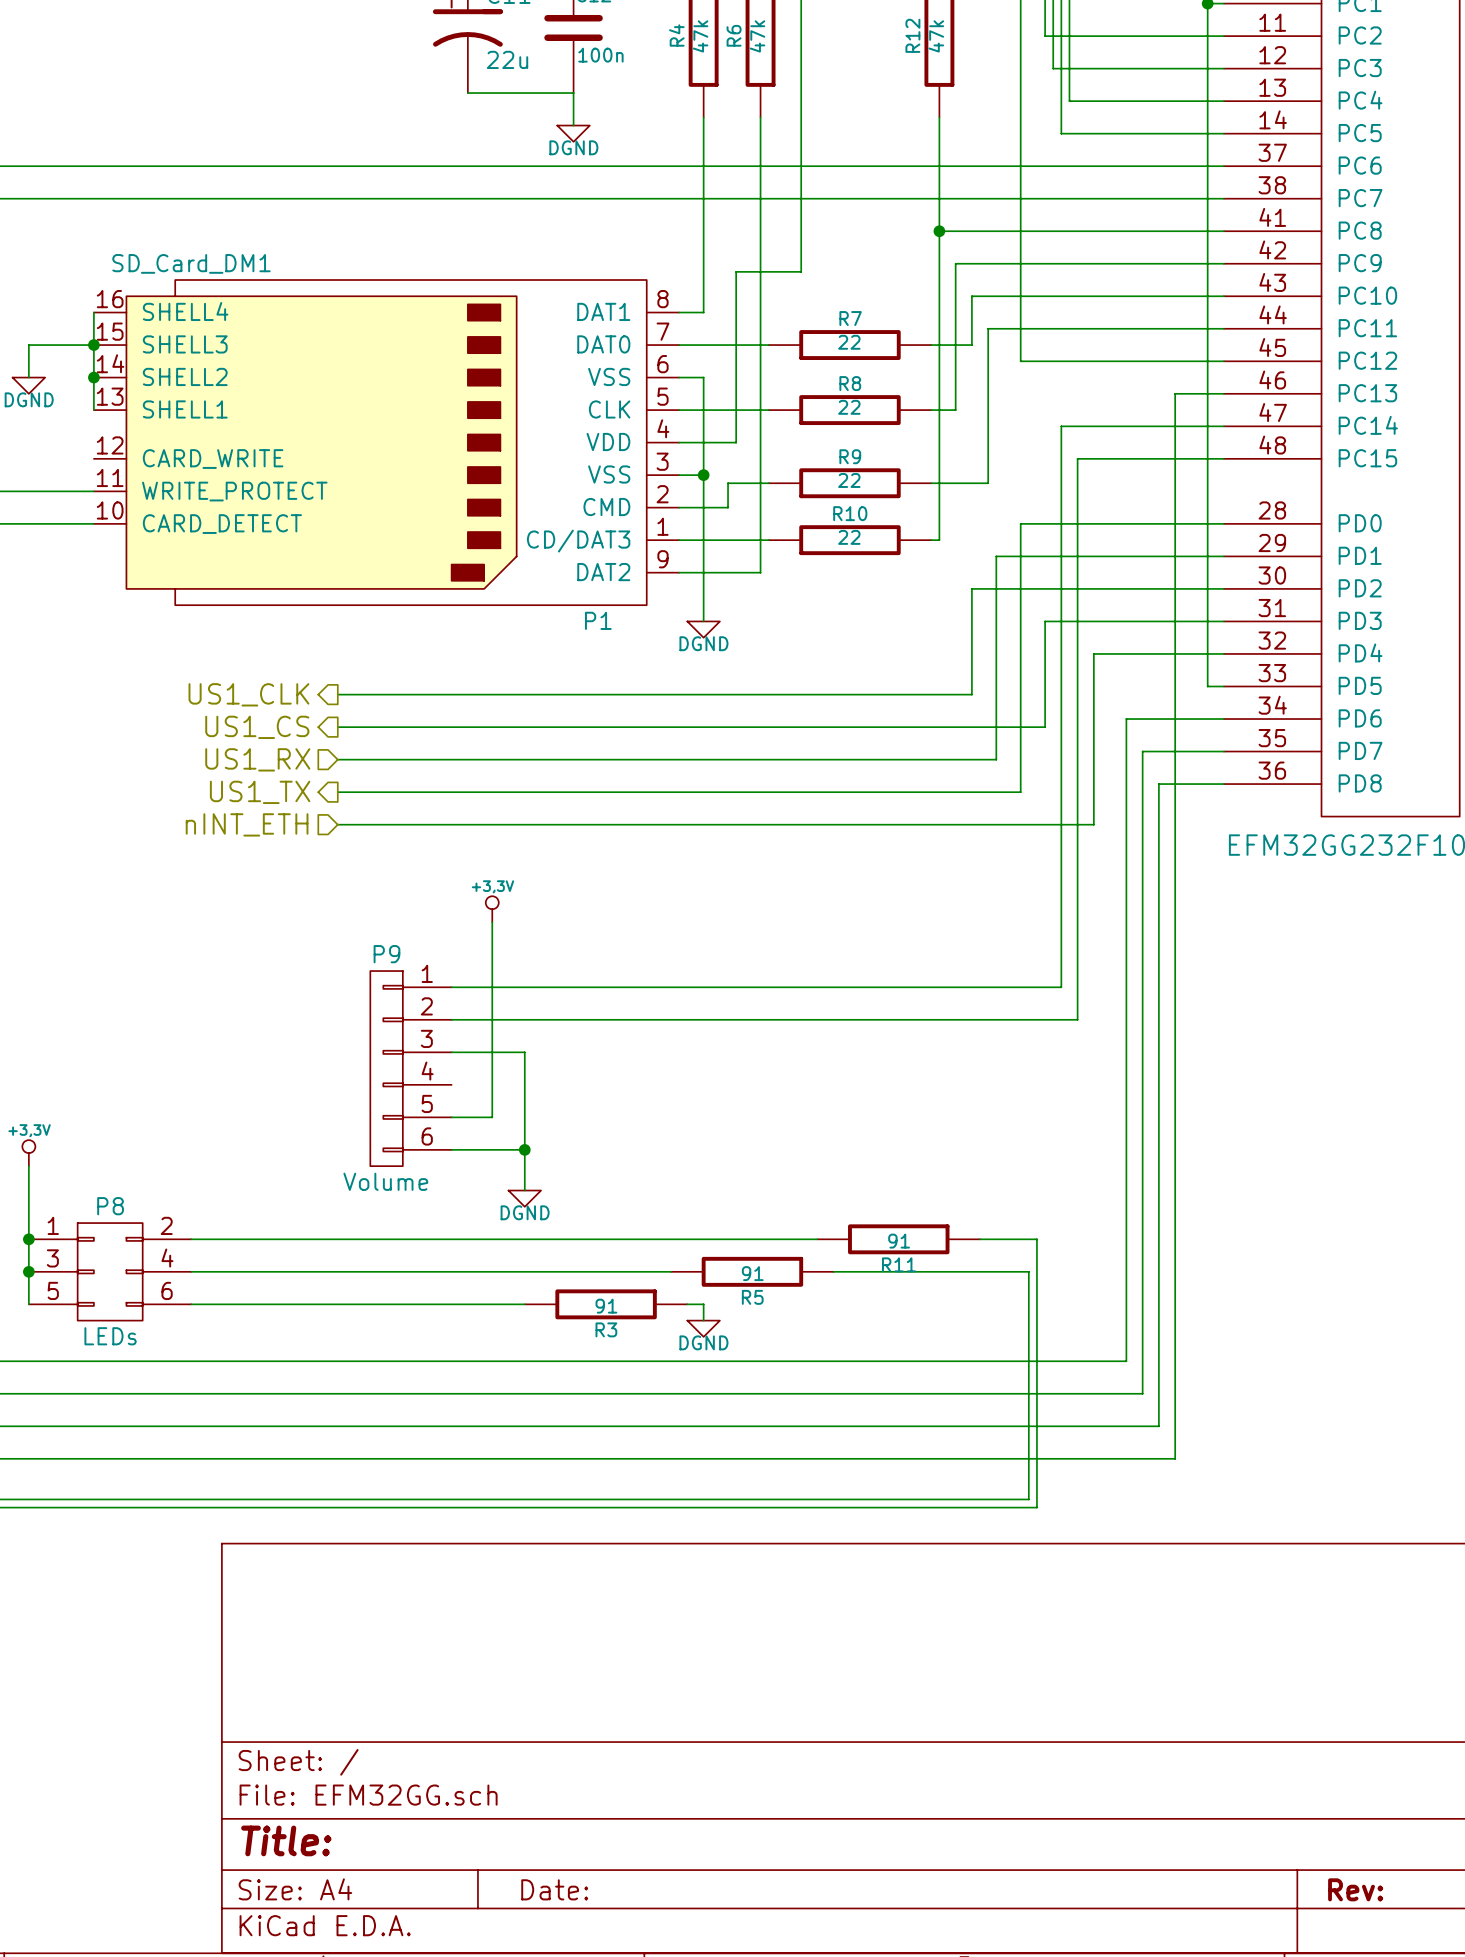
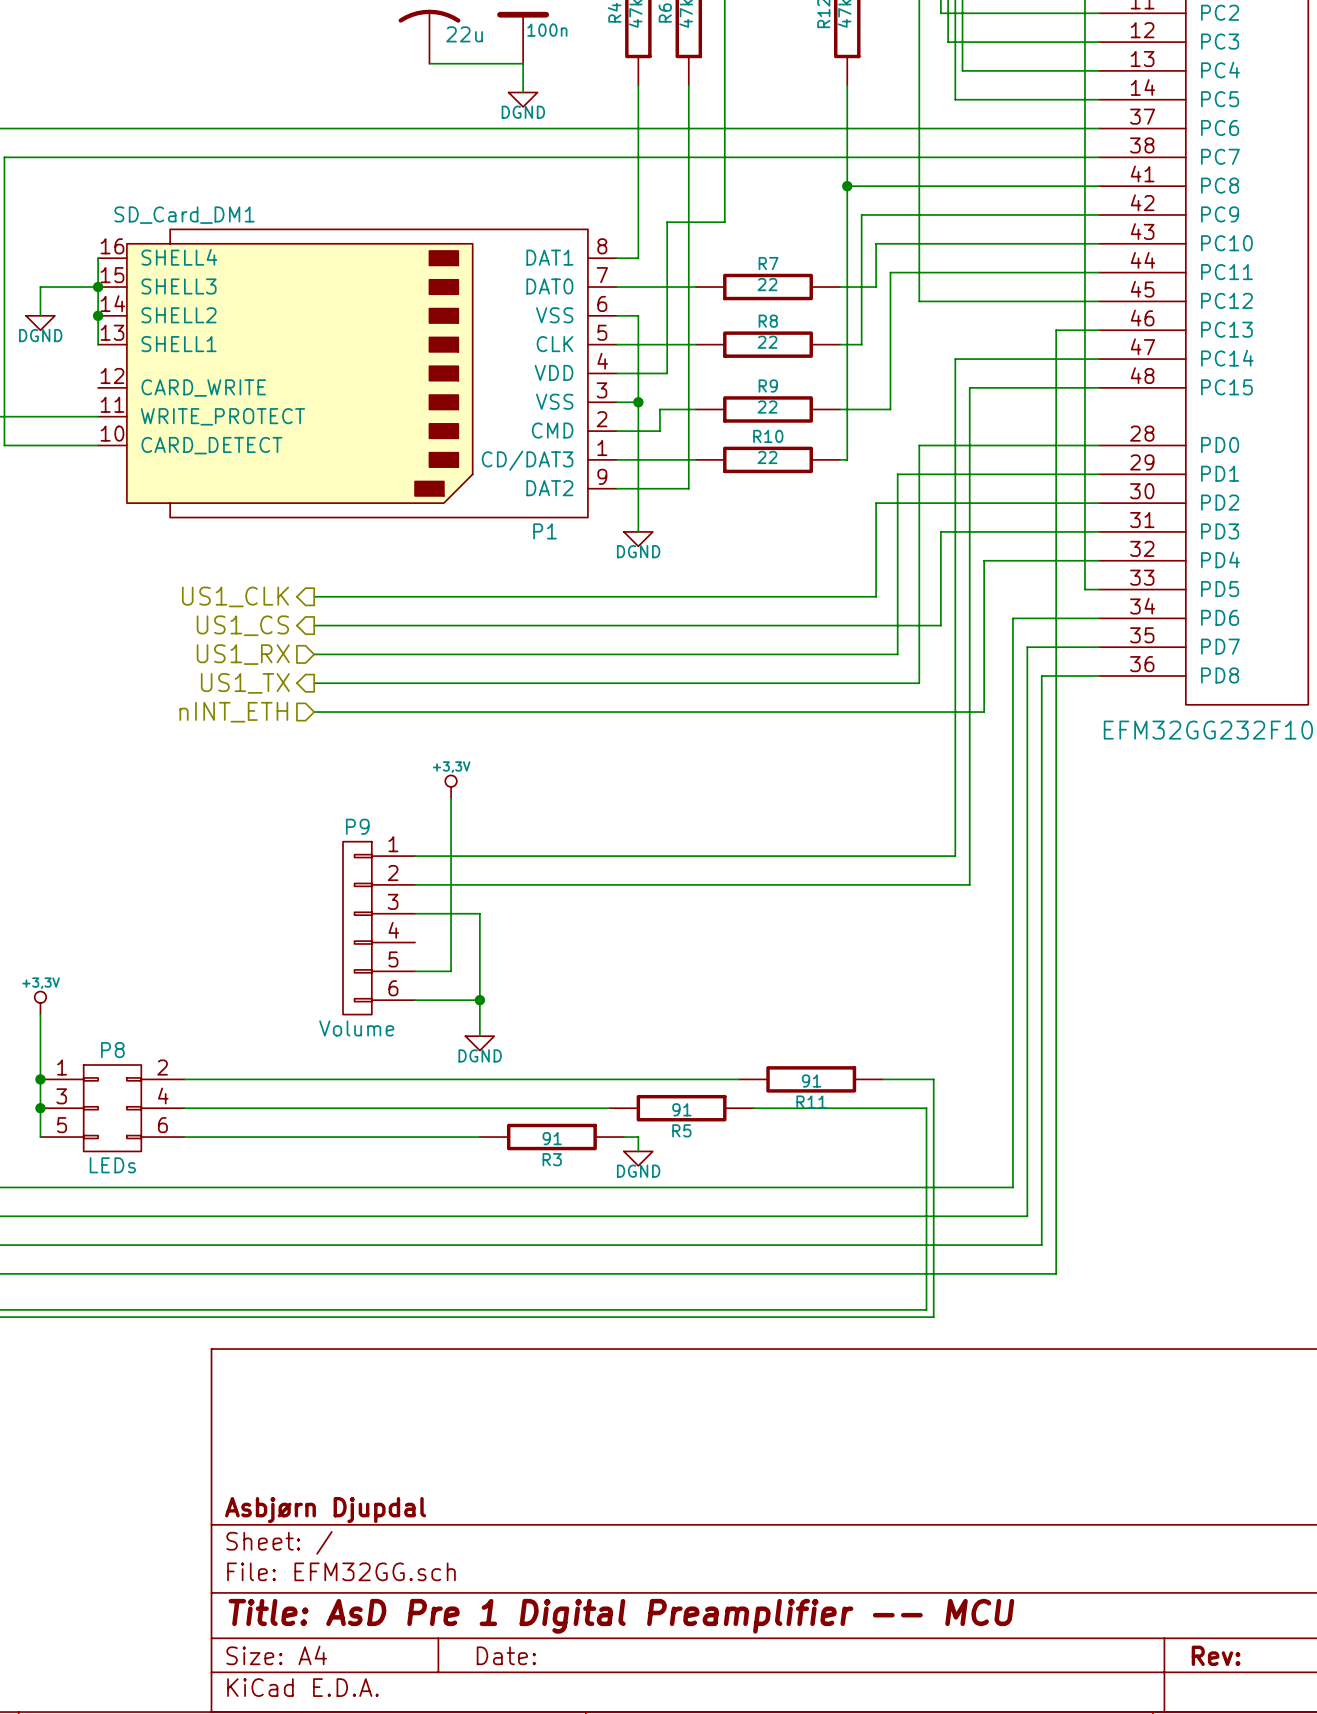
title block: none -> Asbjørn Djupdal (325, 1510)
title block: Title: (286, 1840) -> Title: AsD Pre 1 Digital Preamplifier -- MCU (621, 1616)

